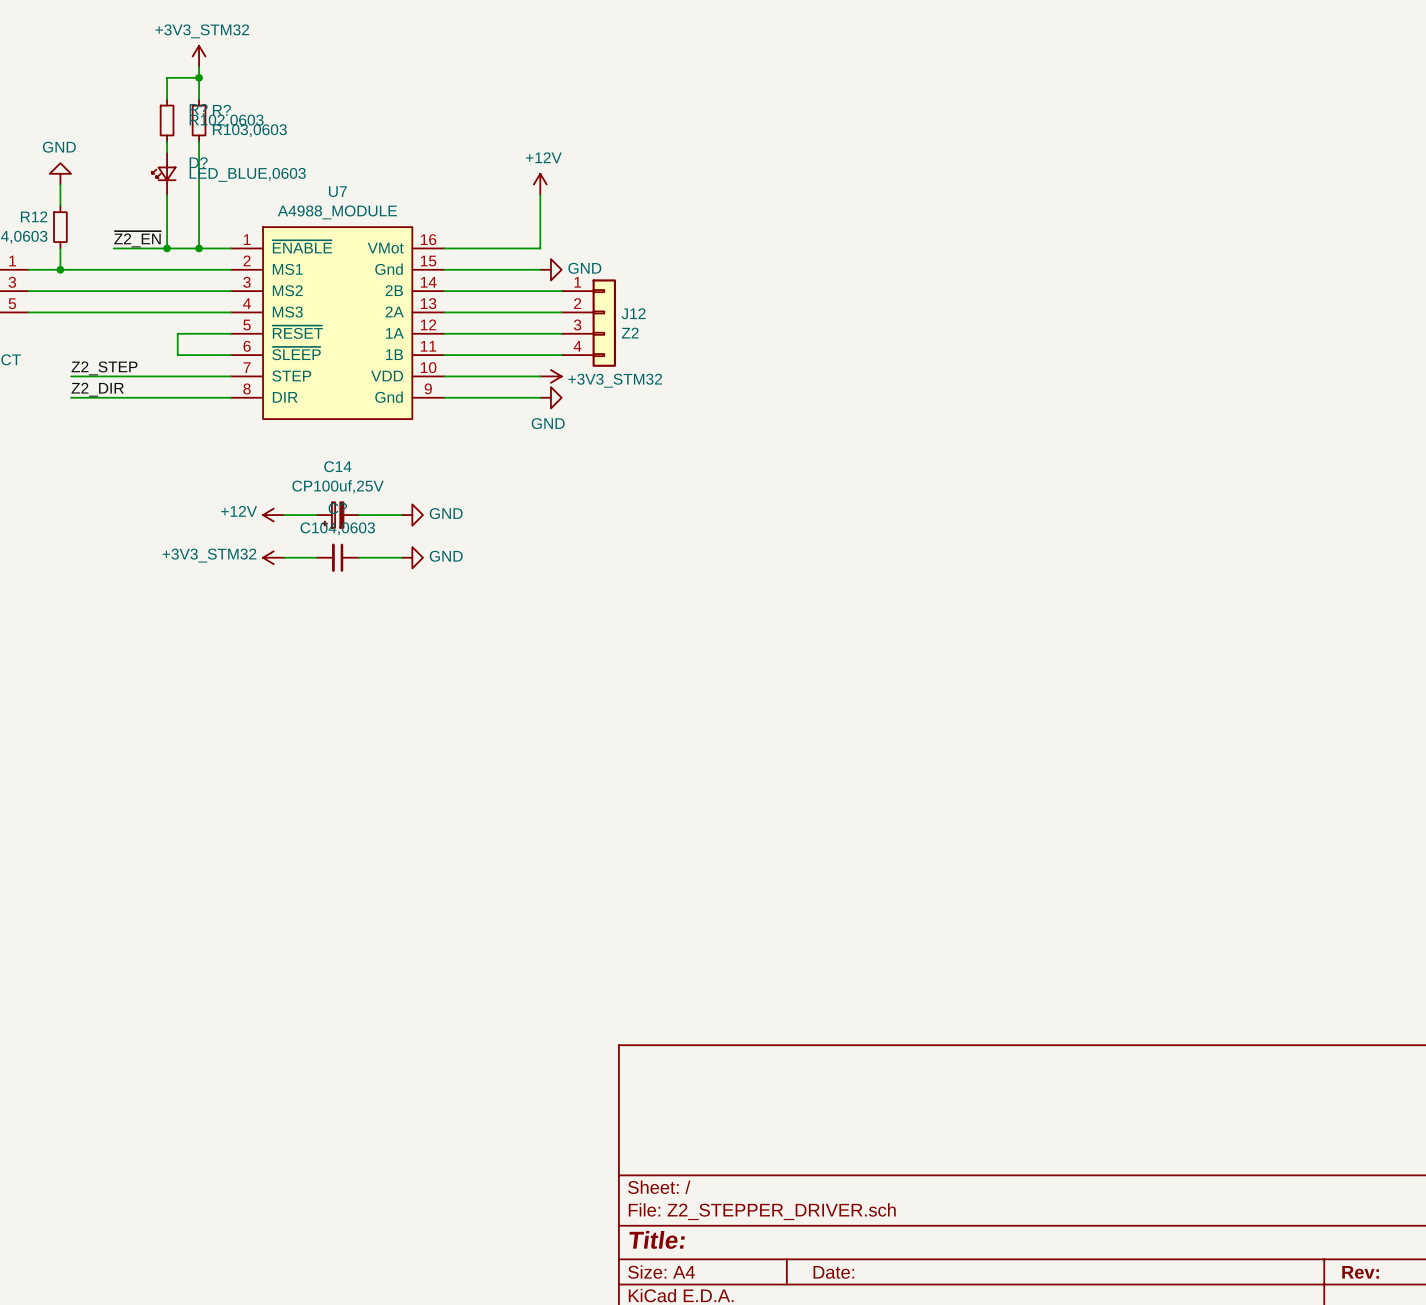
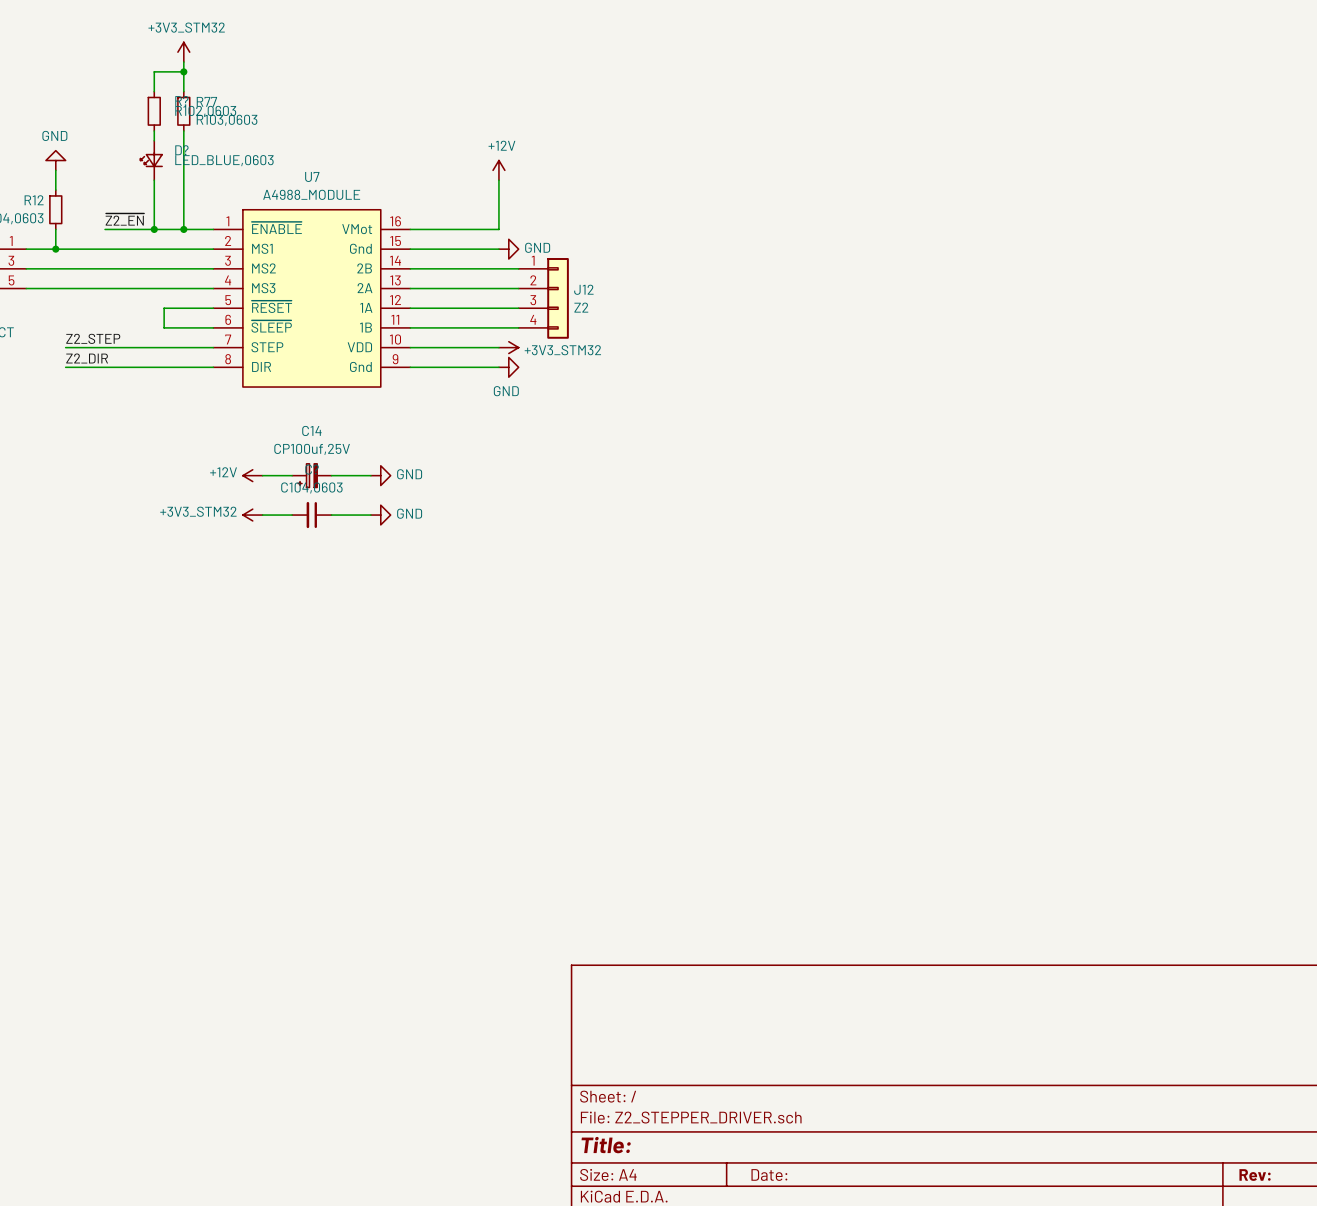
R? name: R? (221, 110) -> R77 (206, 101)

